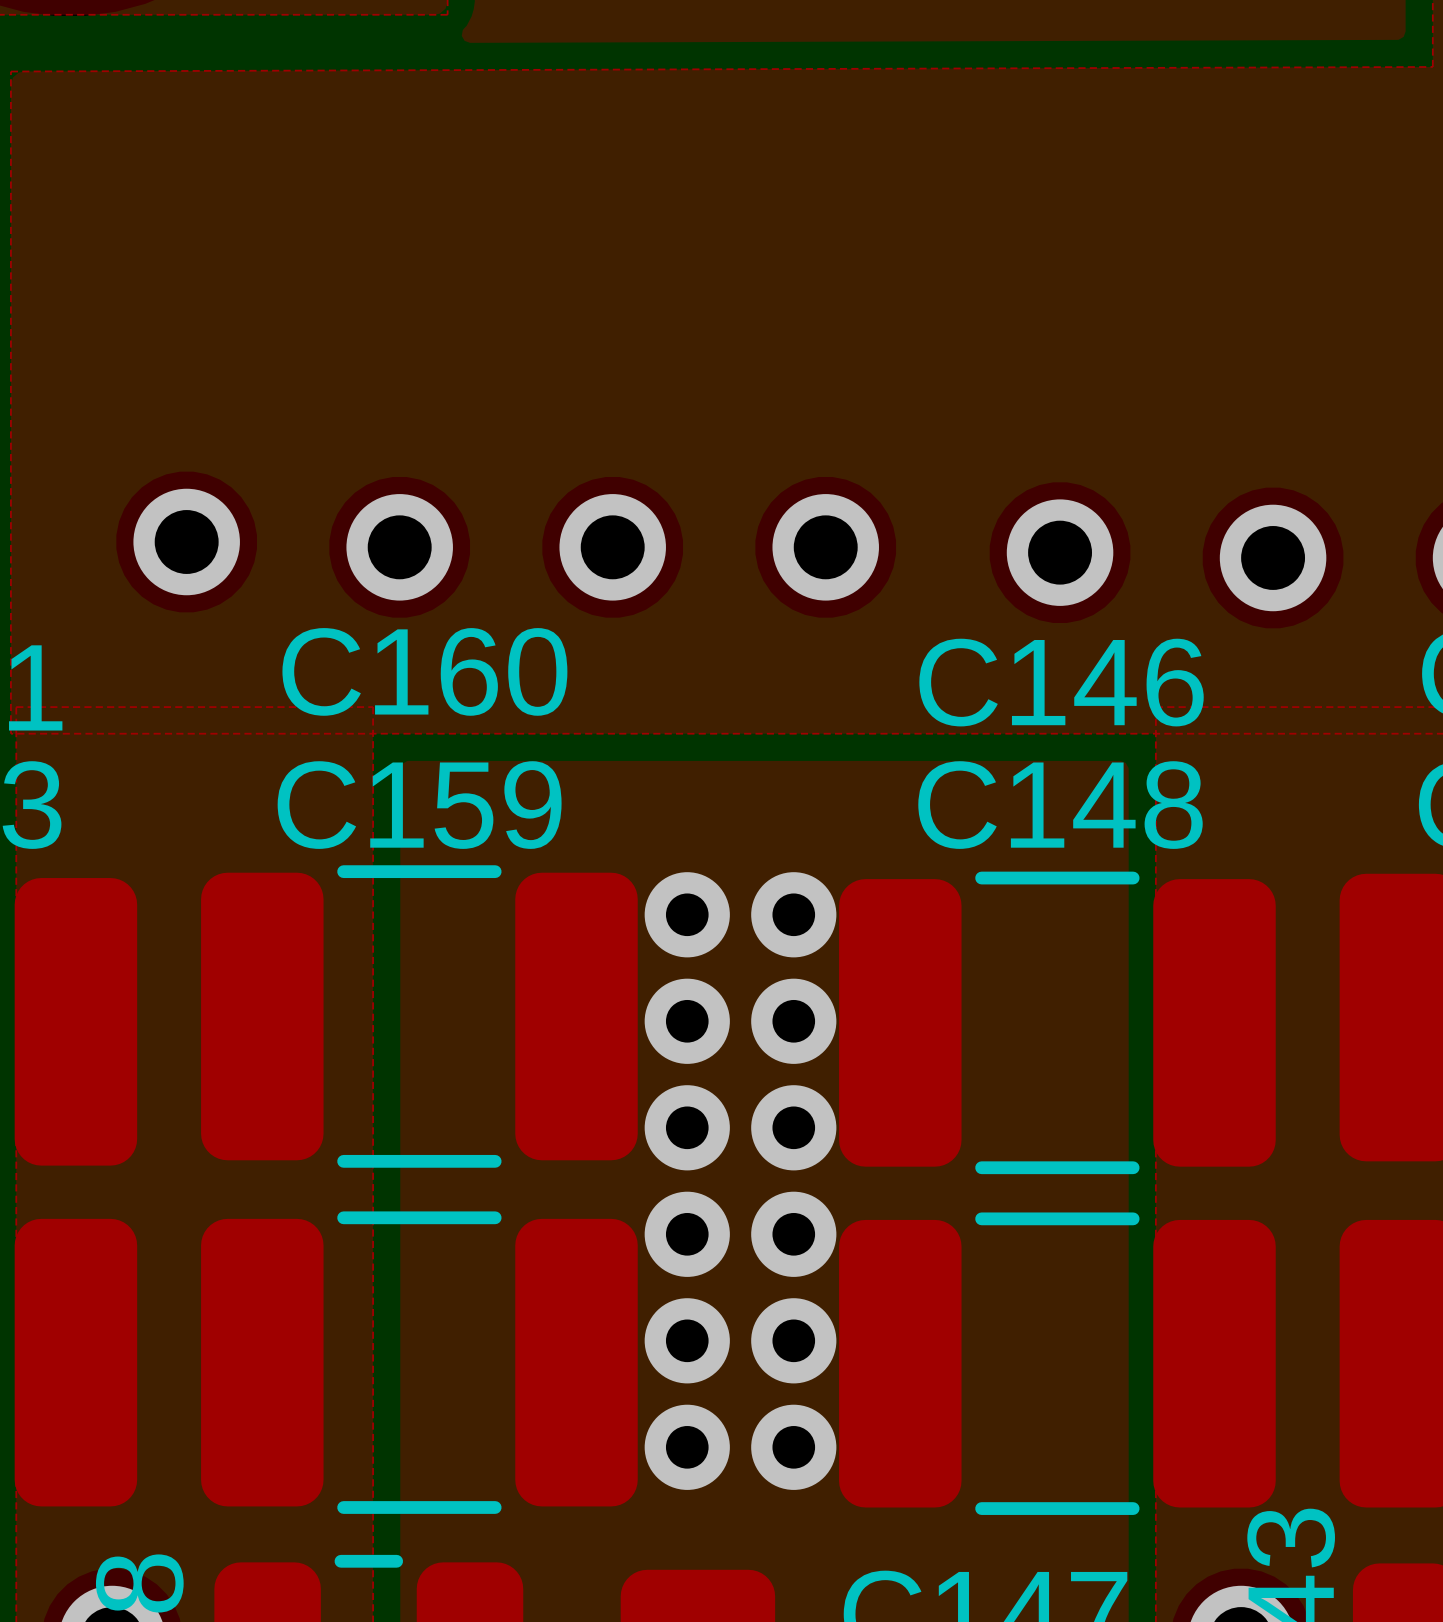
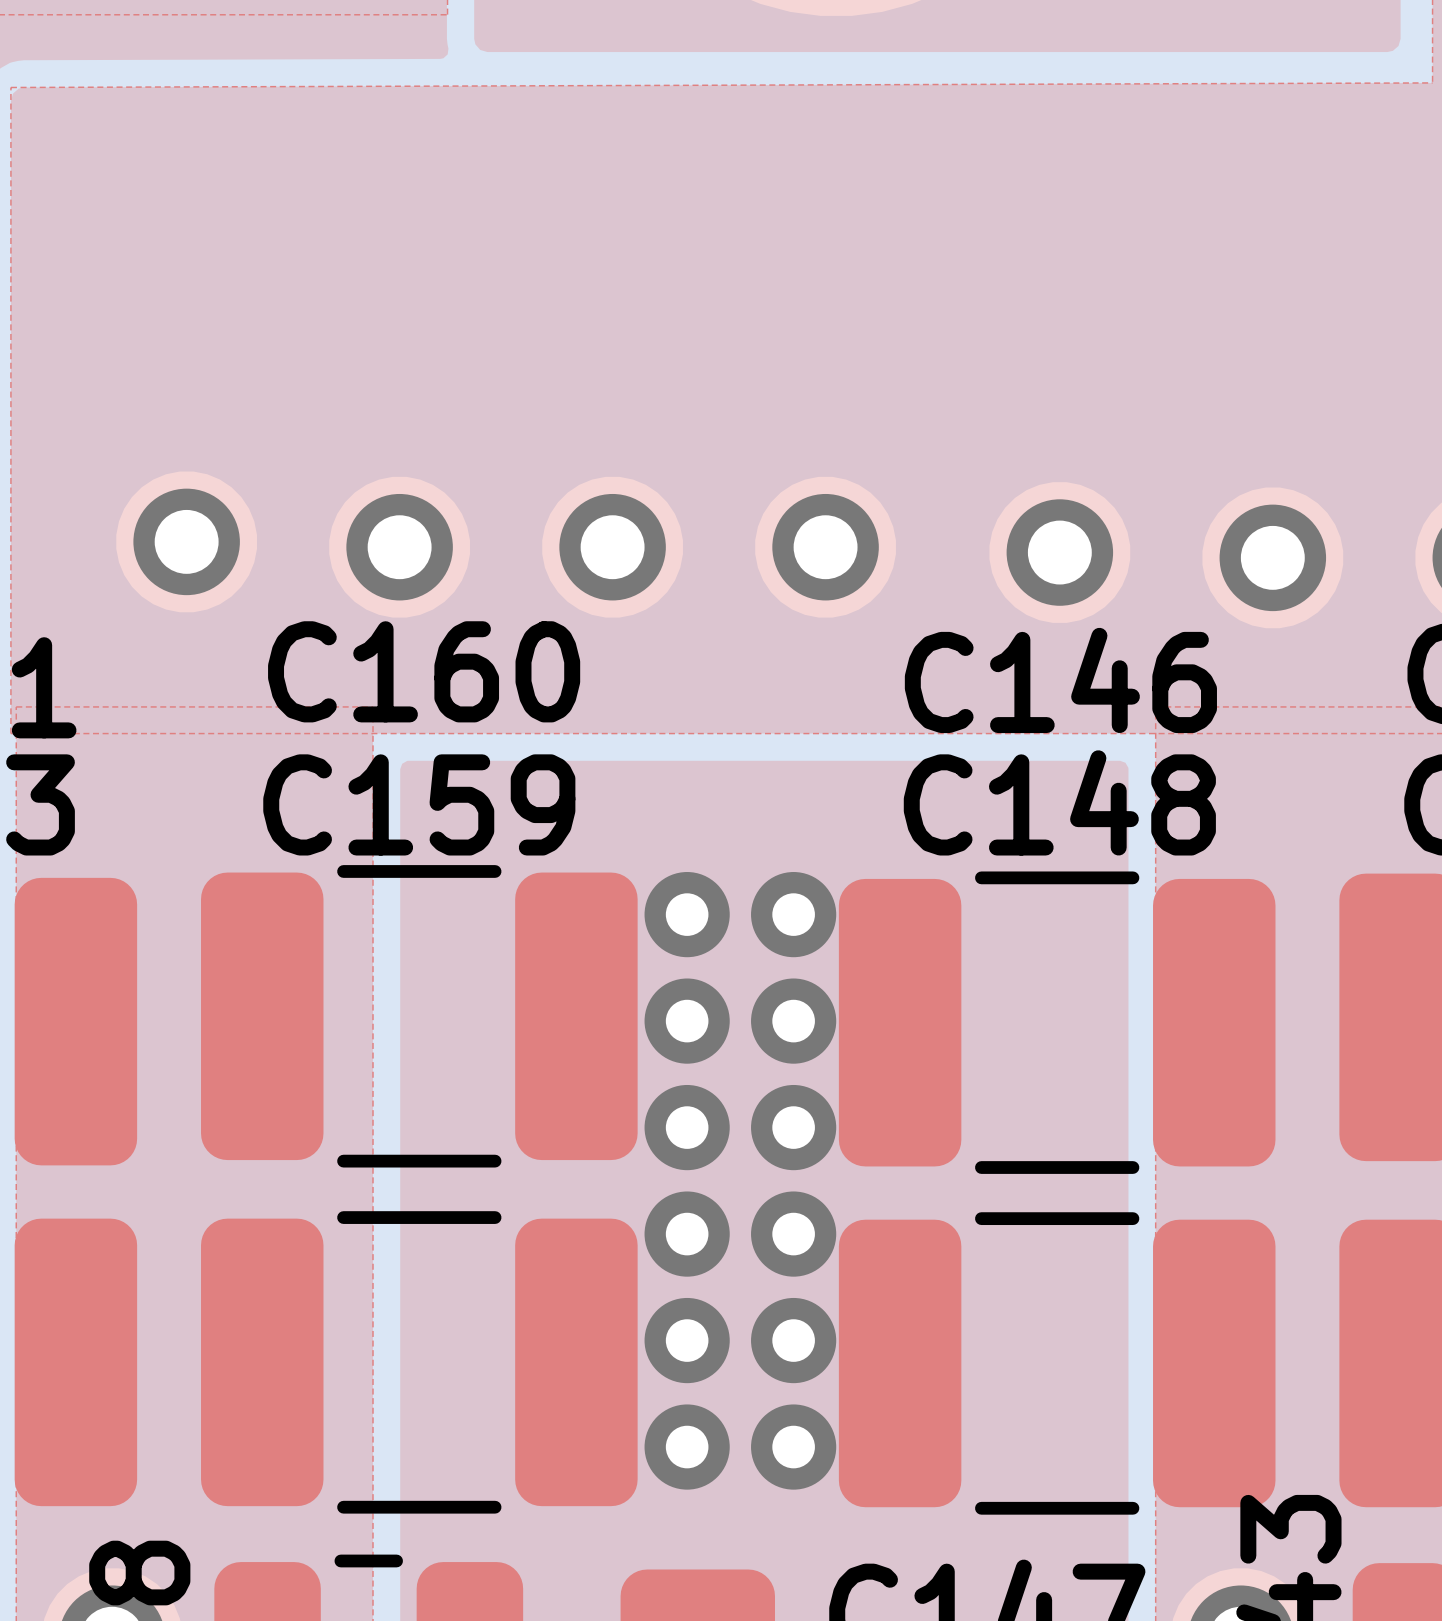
top zone outline: (1432, 66) (10, 71) (10, 87) -> (1432, 66) (1432, 82) (10, 87)

